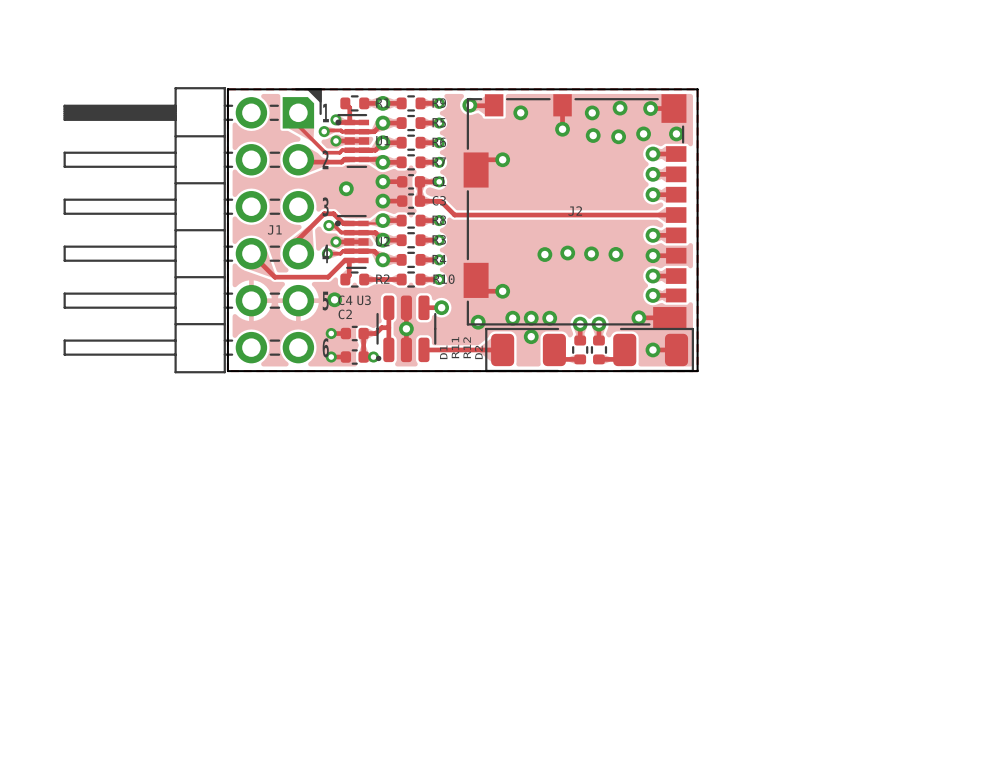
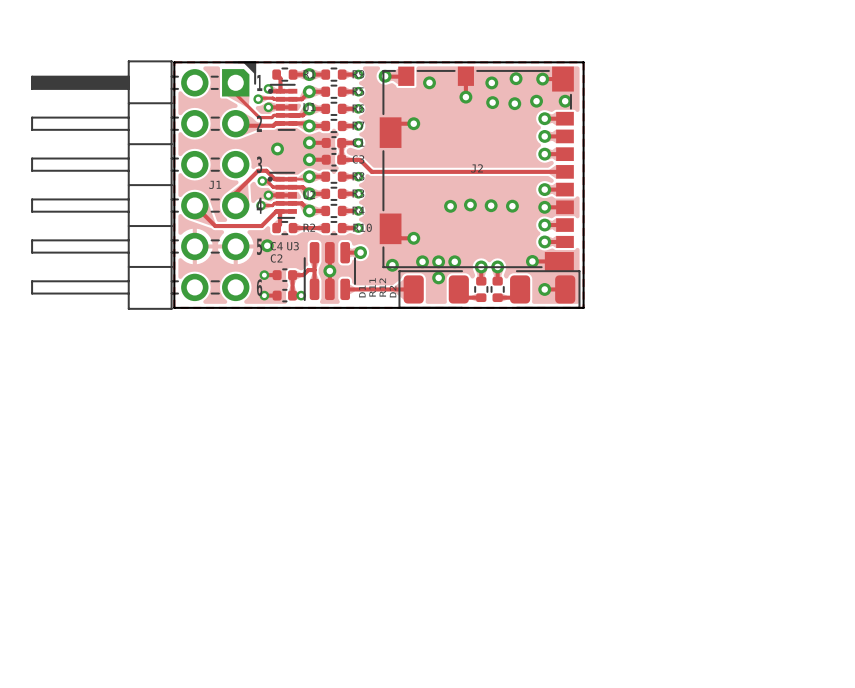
U3 footprint: [375, 295, 437, 363] -> [303, 242, 356, 302]

